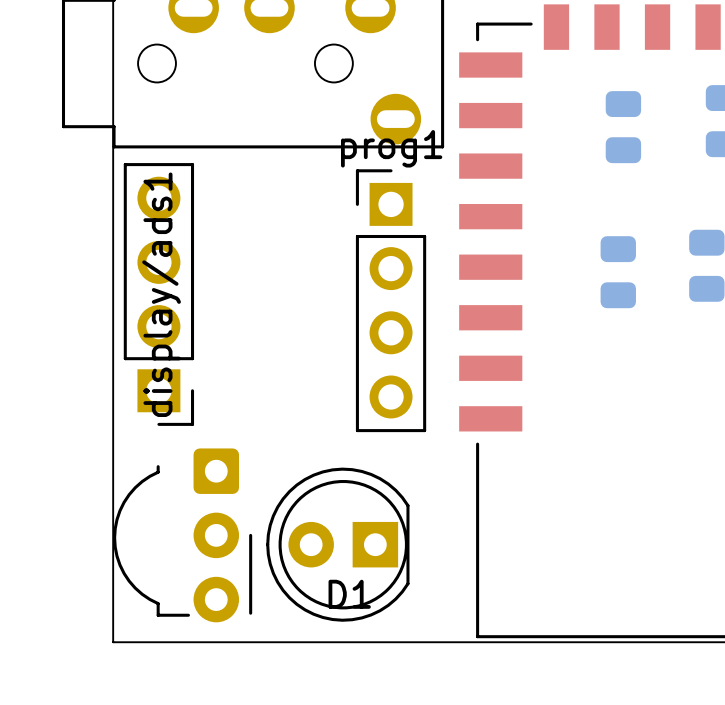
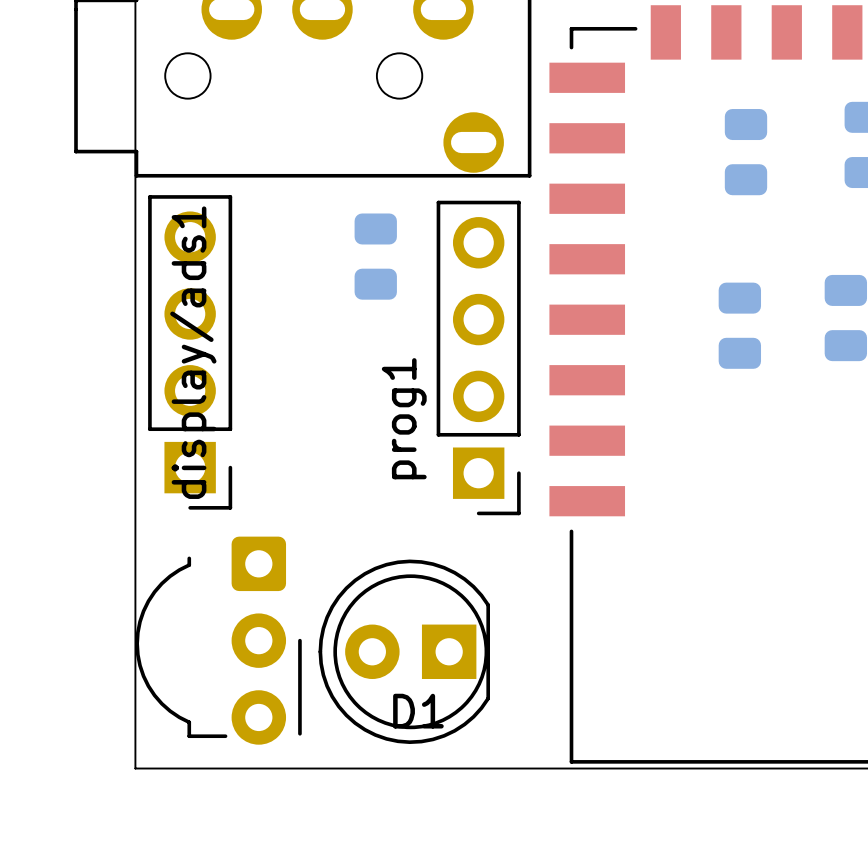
prog1 name position: prog1 (391, 148) -> prog1 (404, 418)
part: none -> (375, 256)
prog1 rotation: 0° (391, 300) -> 180° (478, 357)

